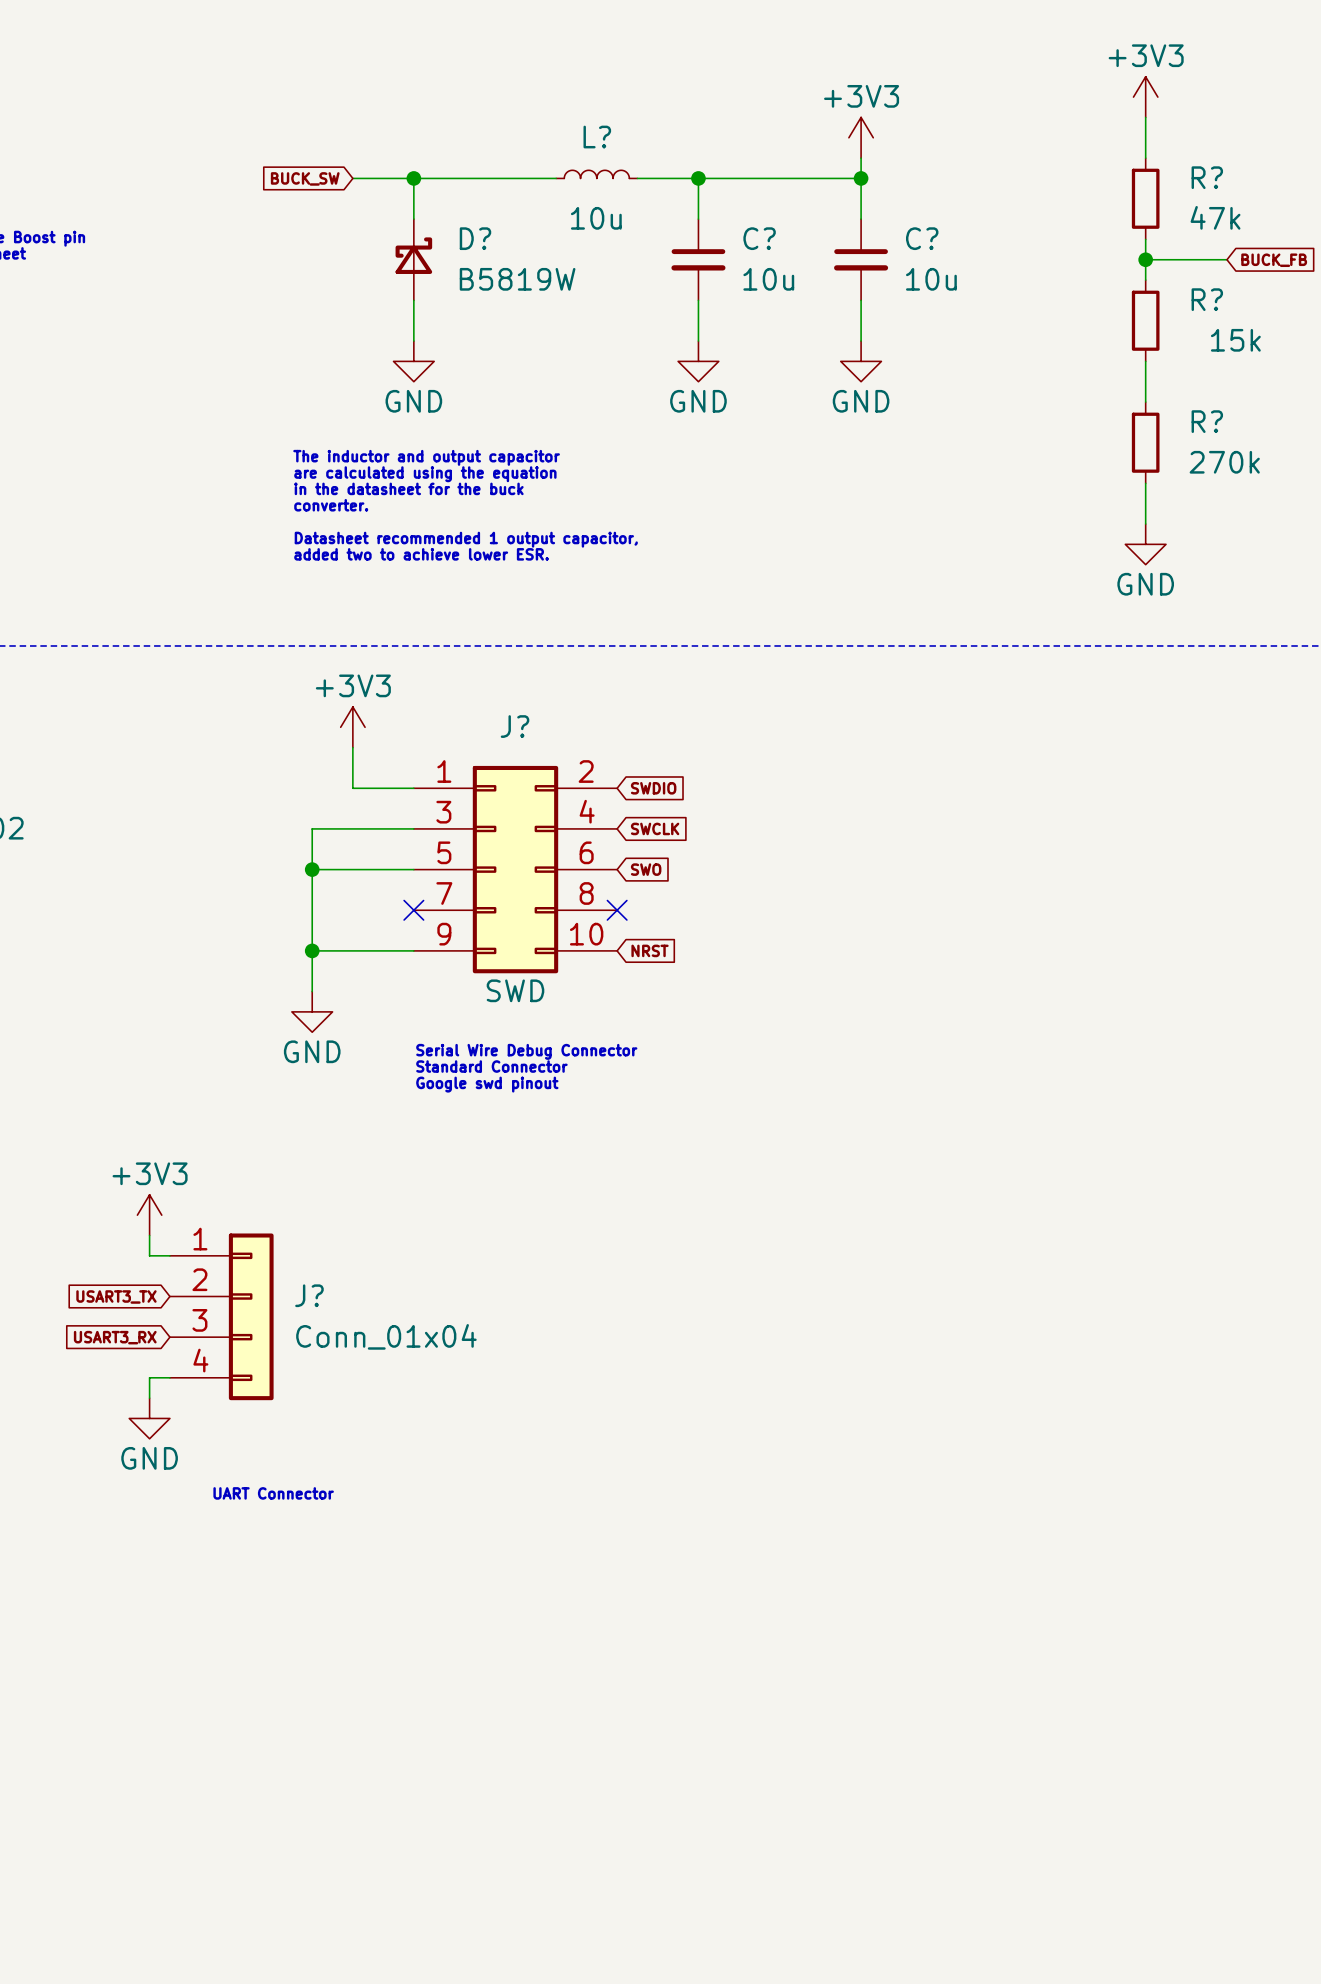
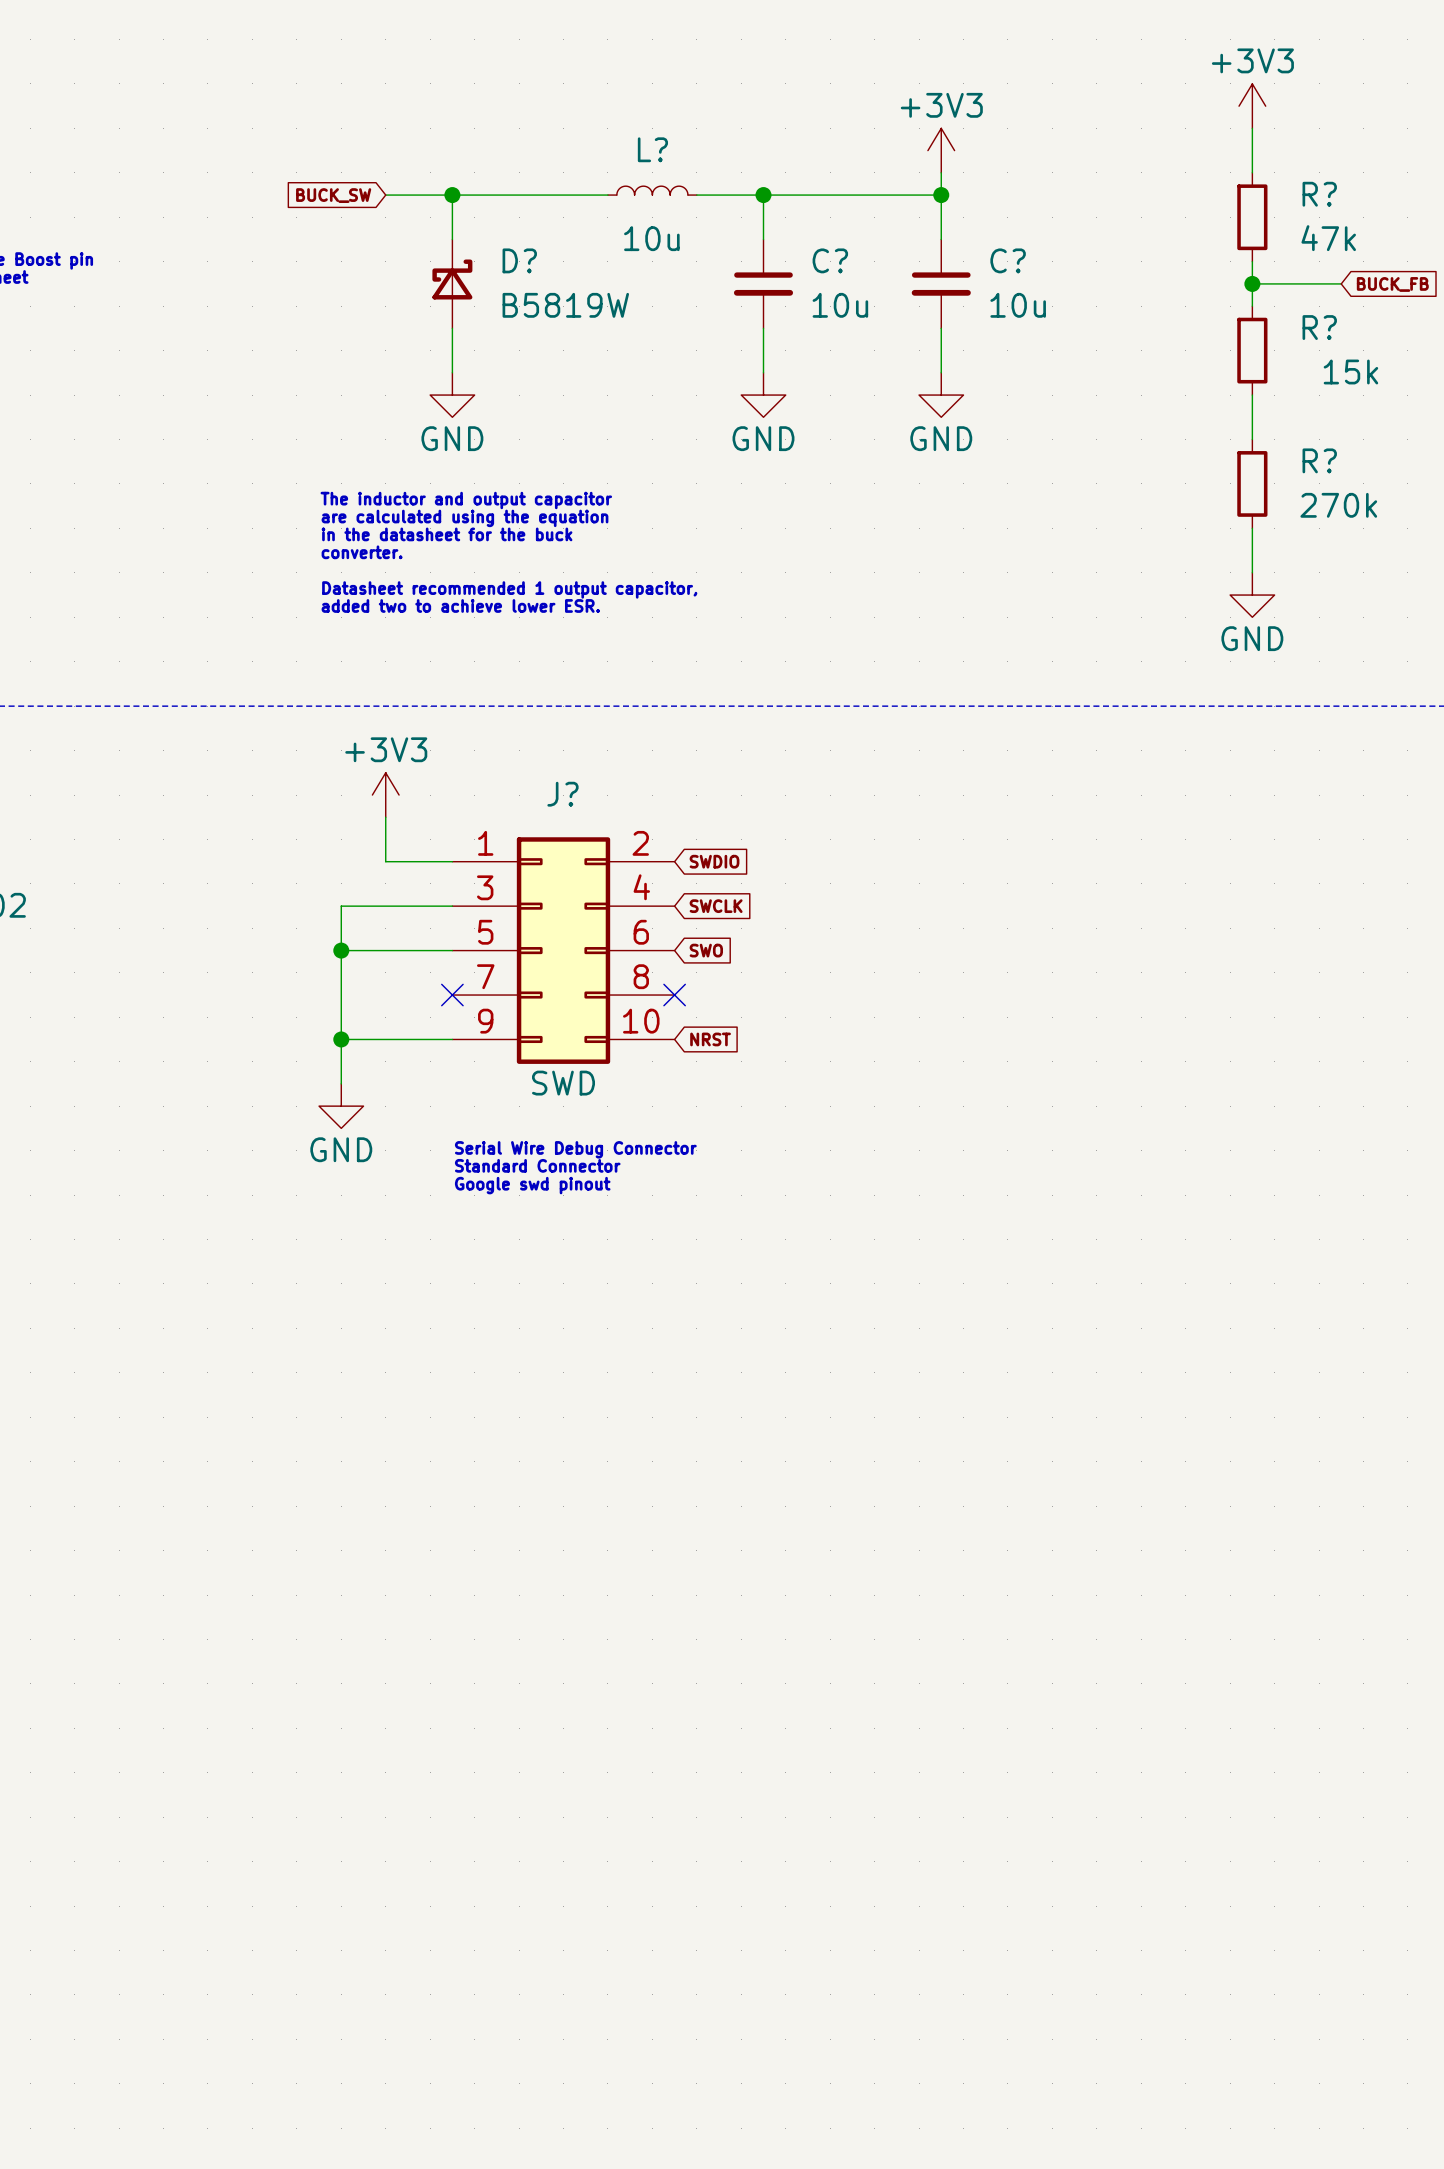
power symbol: +3V3 (149, 1215) -> none
wire: (149, 1235) (149, 1255) (169, 1255) -> none
global label: USART3_TX (116, 1296) -> none
J?: Conn_01x04 (221, 1316) -> none
global label: USART3_RX (115, 1337) -> none
wire: (169, 1377) (149, 1377) (149, 1398) -> none
power symbol: GND (149, 1418) -> none
text: UART Connector (273, 1493) -> none

